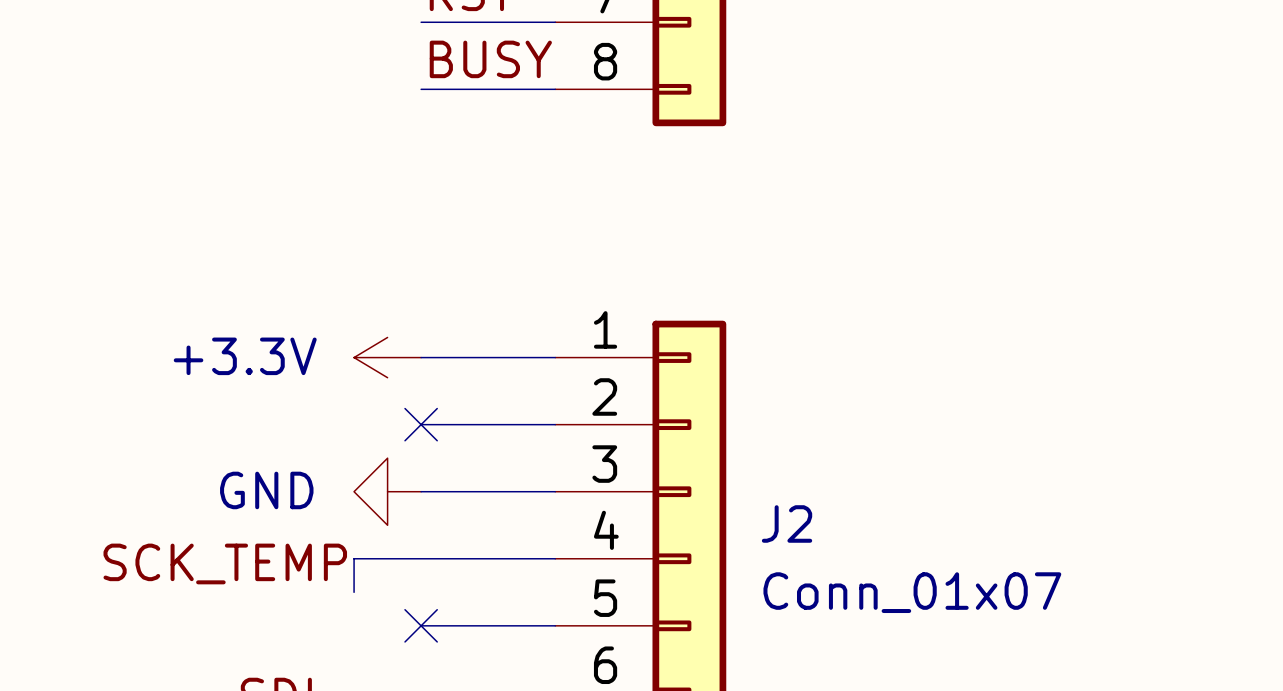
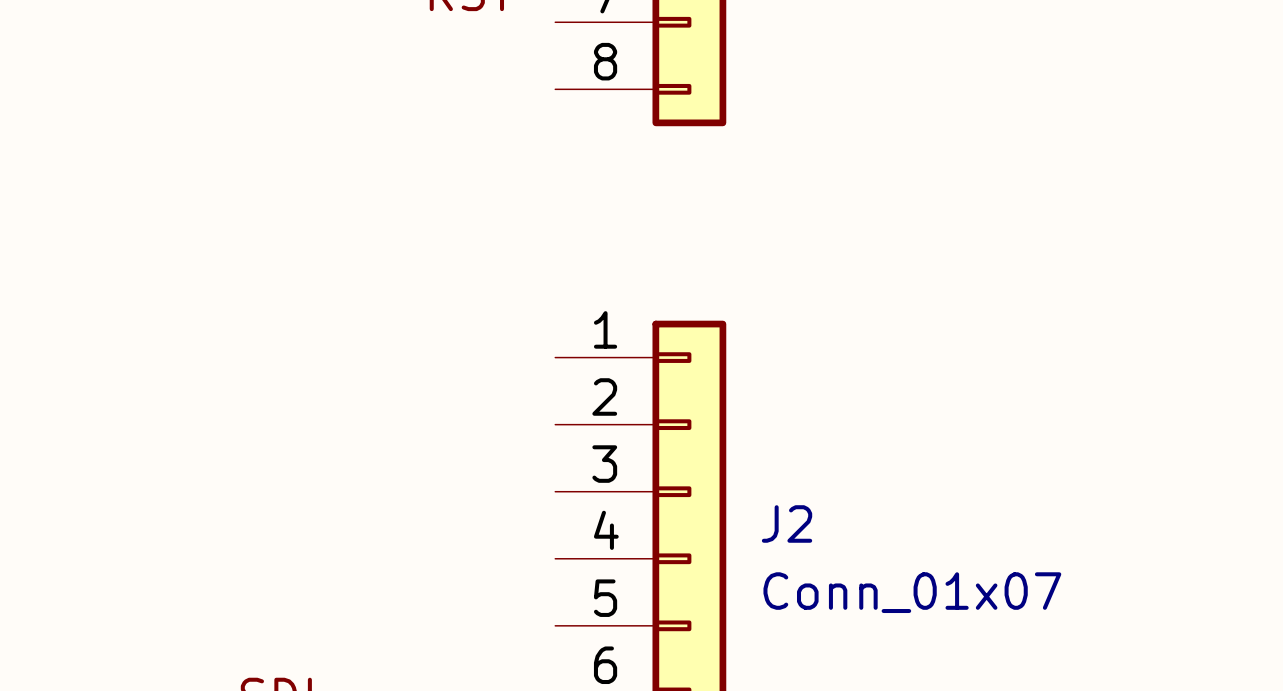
wire: (421, 22) (555, 22) -> none
label: BUSY (490, 59) -> none
wire: (421, 89) (555, 89) -> none
power symbol: +3.3V (387, 357) -> none
wire: (421, 357) (555, 357) -> none
wire: (421, 424) (555, 424) -> none
no-connect mark: (421, 424) -> none
power symbol: GND (387, 491) -> none
wire: (421, 491) (555, 491) -> none
wire: (555, 558) (354, 558) (354, 592) -> none
label: SCK_TEMP (225, 563) -> none
wire: (421, 625) (555, 625) -> none
no-connect mark: (421, 625) -> none

